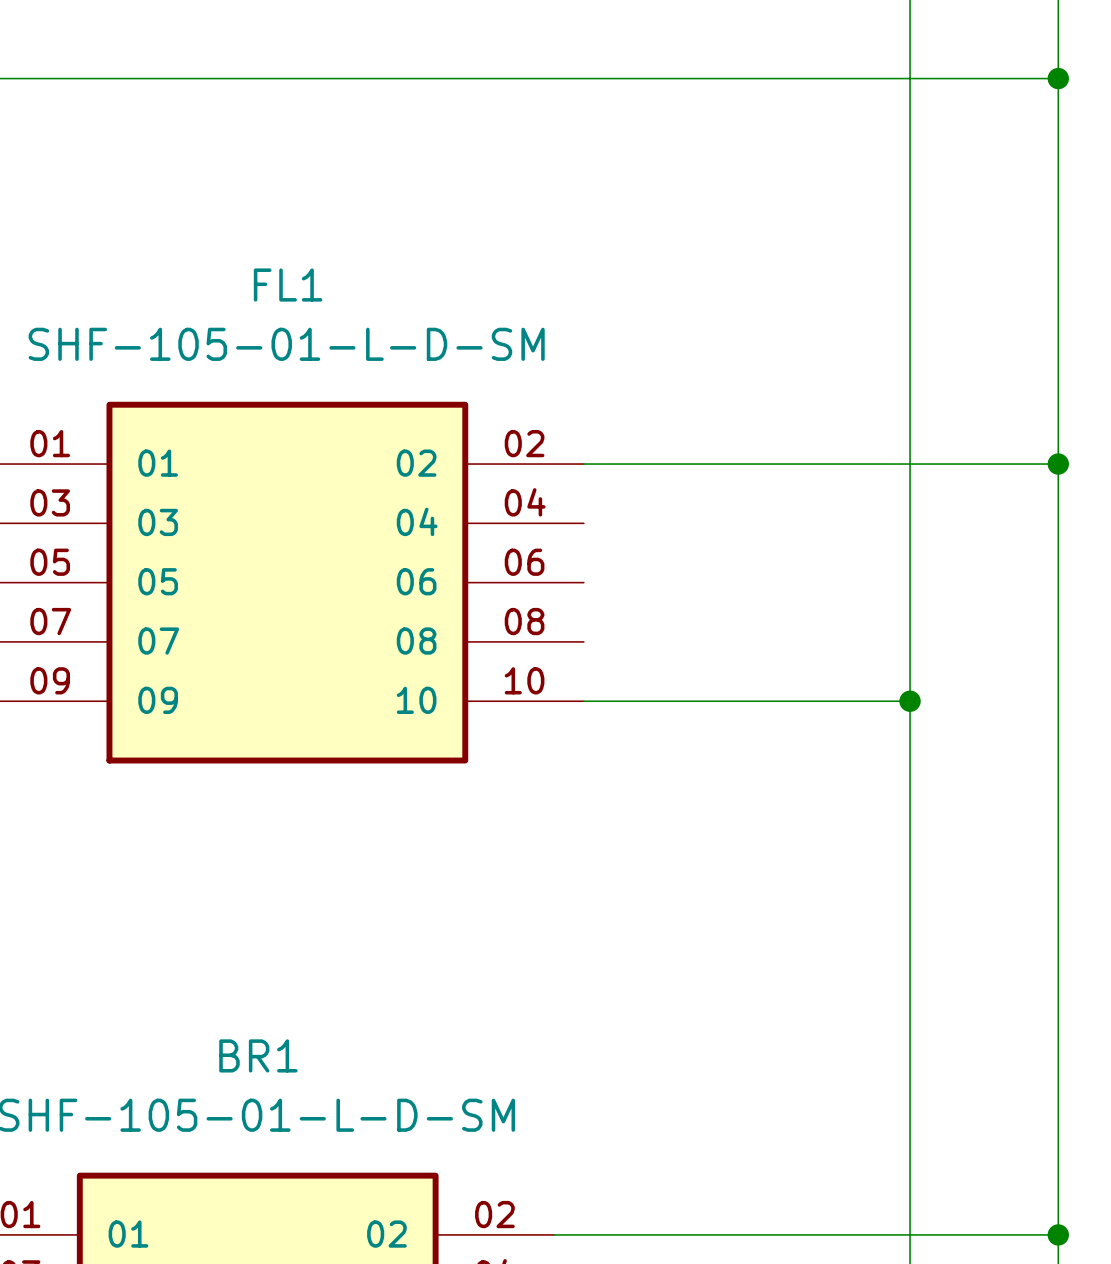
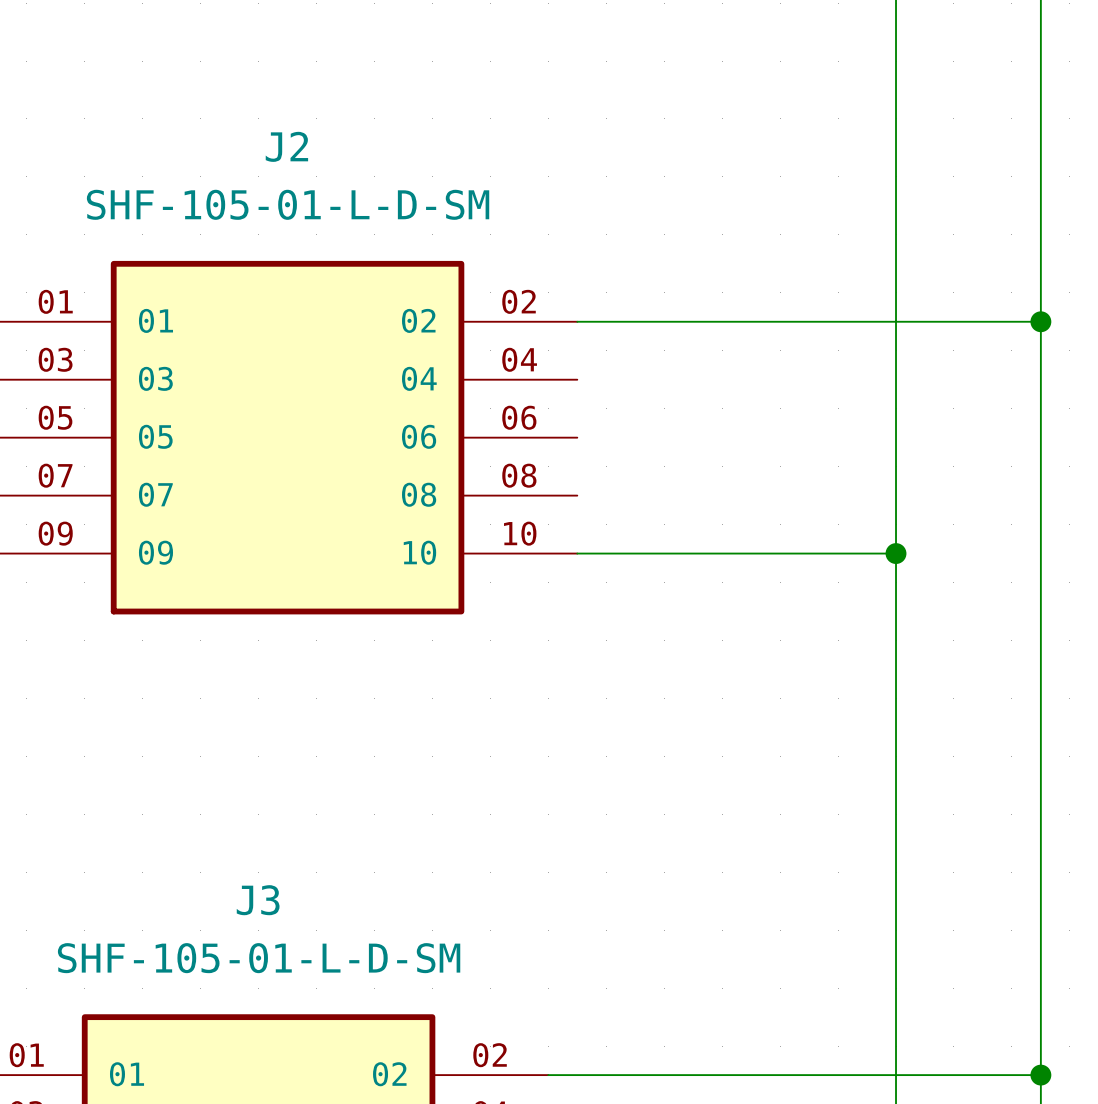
FL1 name: FL1 (288, 285) -> J2 (286, 146)
BR1 name: BR1 (258, 1055) -> J3 (258, 900)

